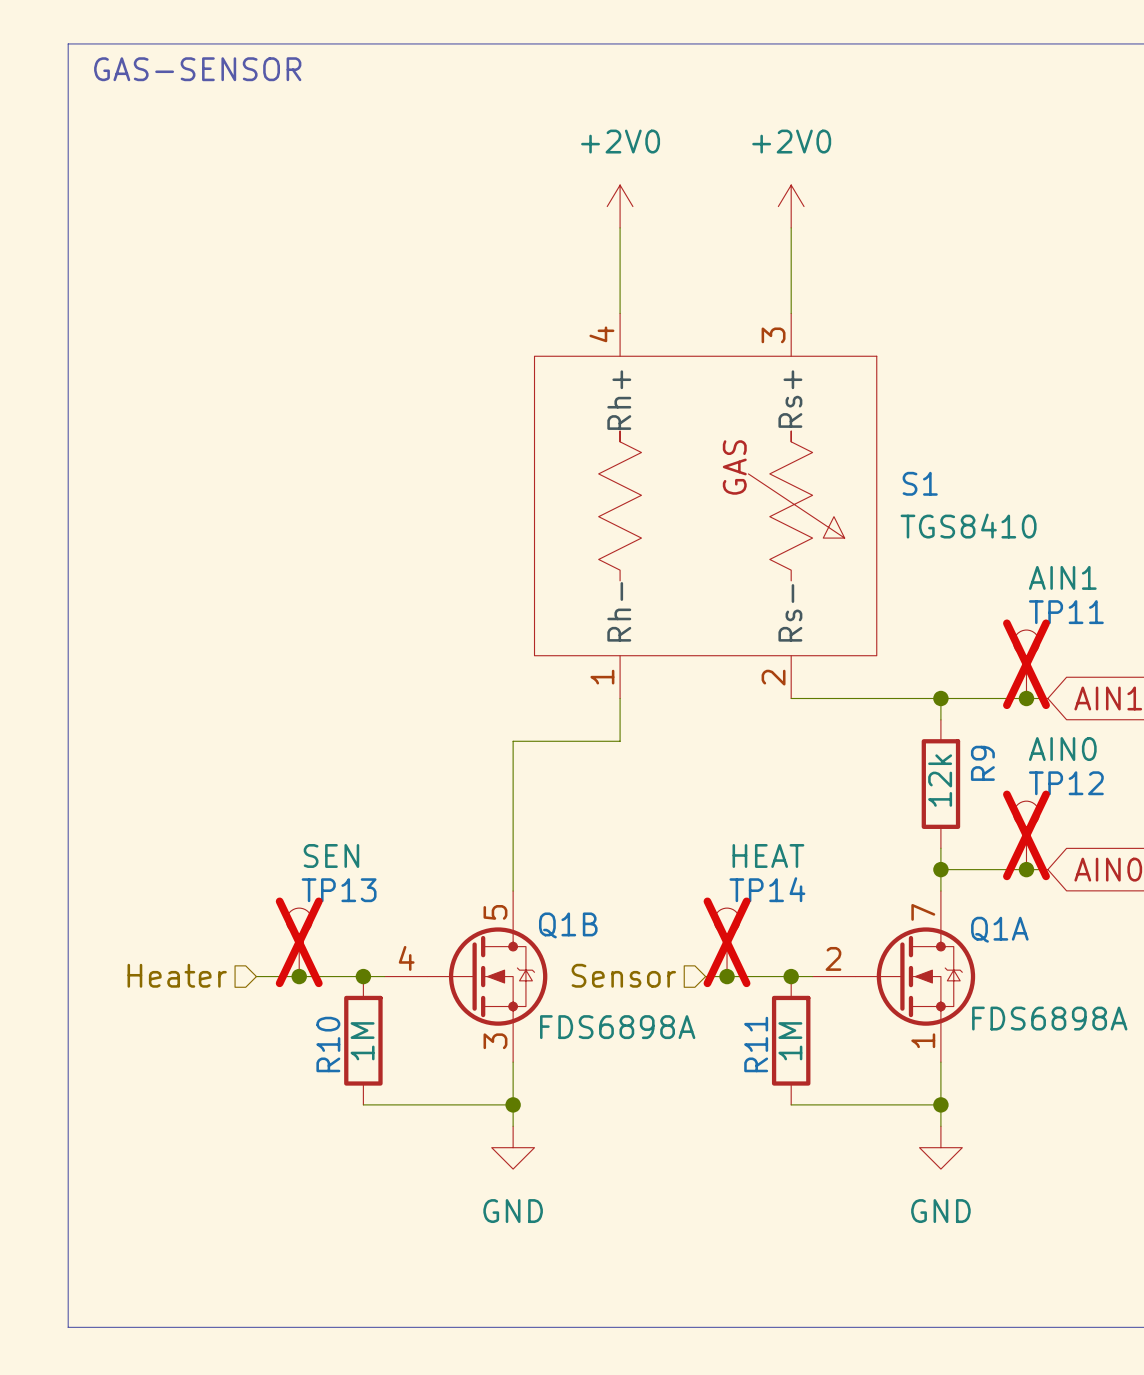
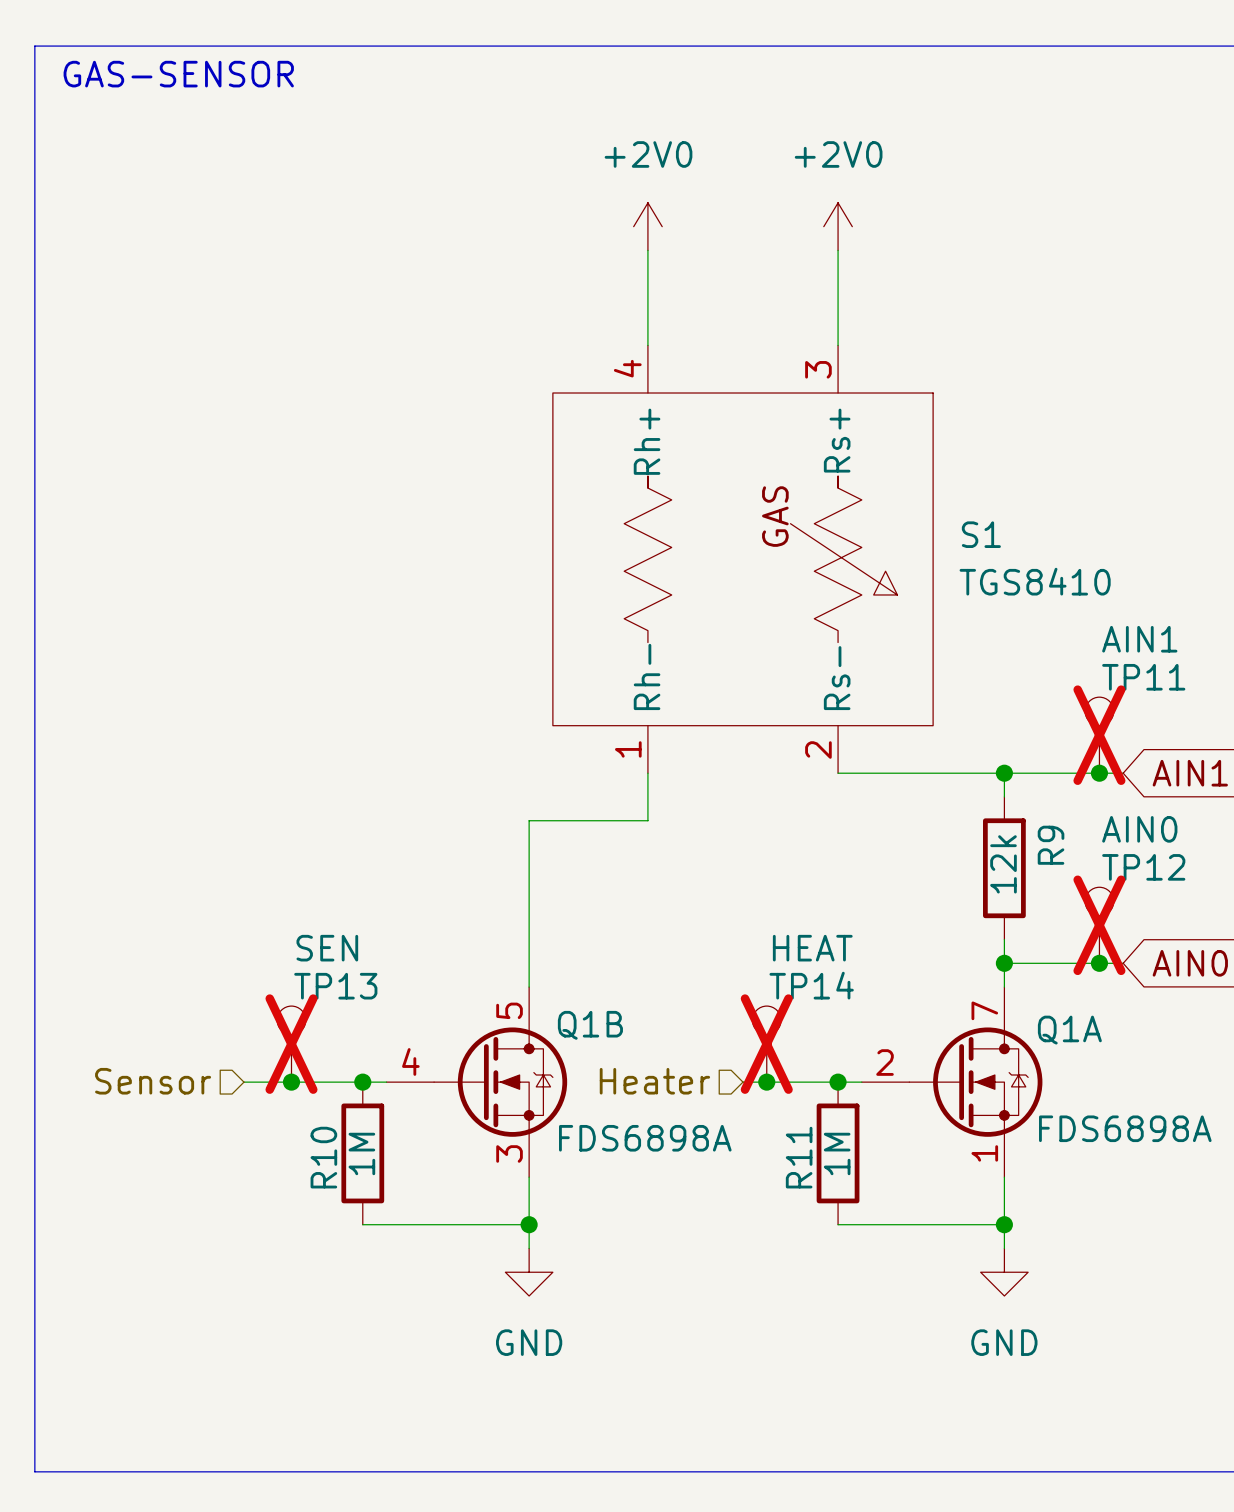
hierarchical label: Heater (177, 975) -> Sensor (153, 1081)
hierarchical label: Sensor (623, 975) -> Heater (654, 1081)

